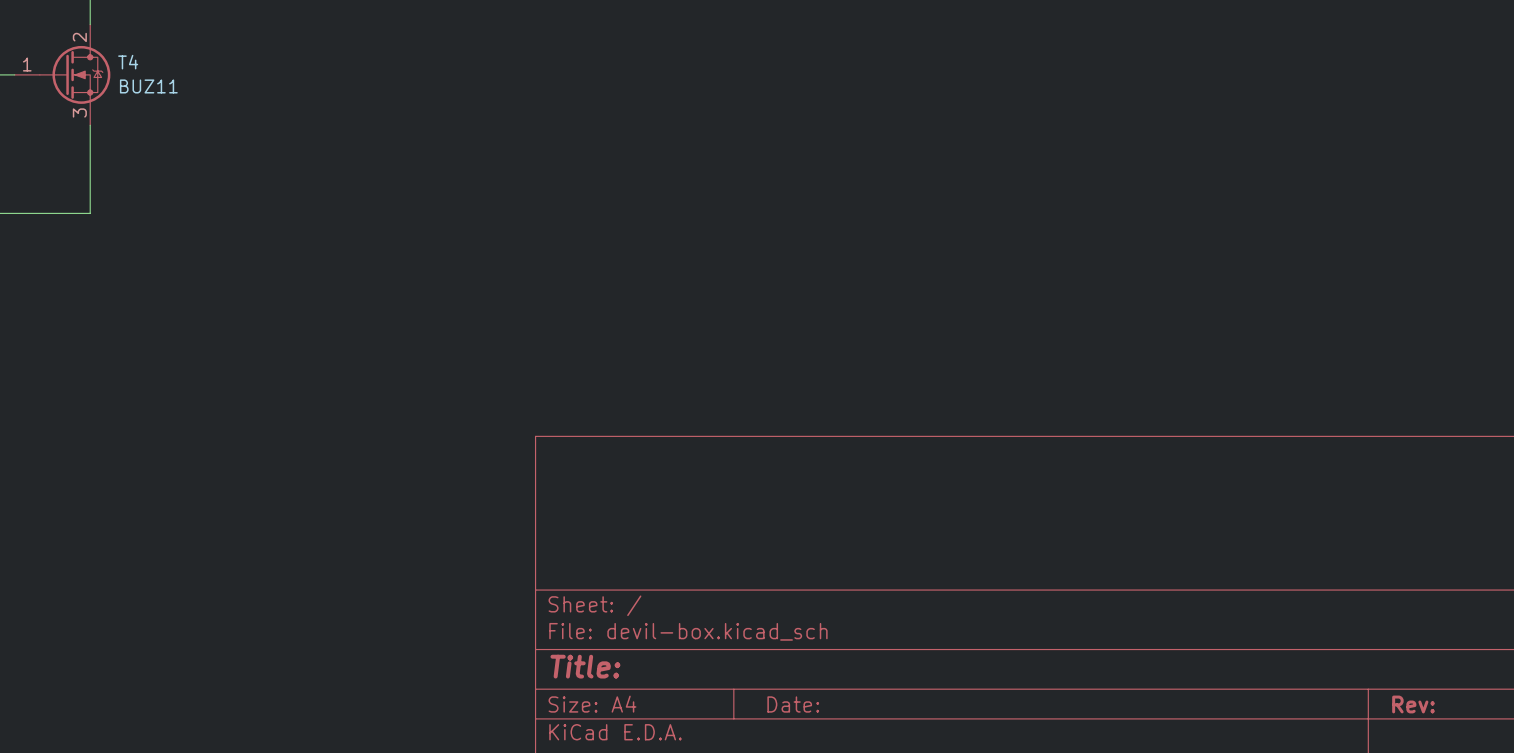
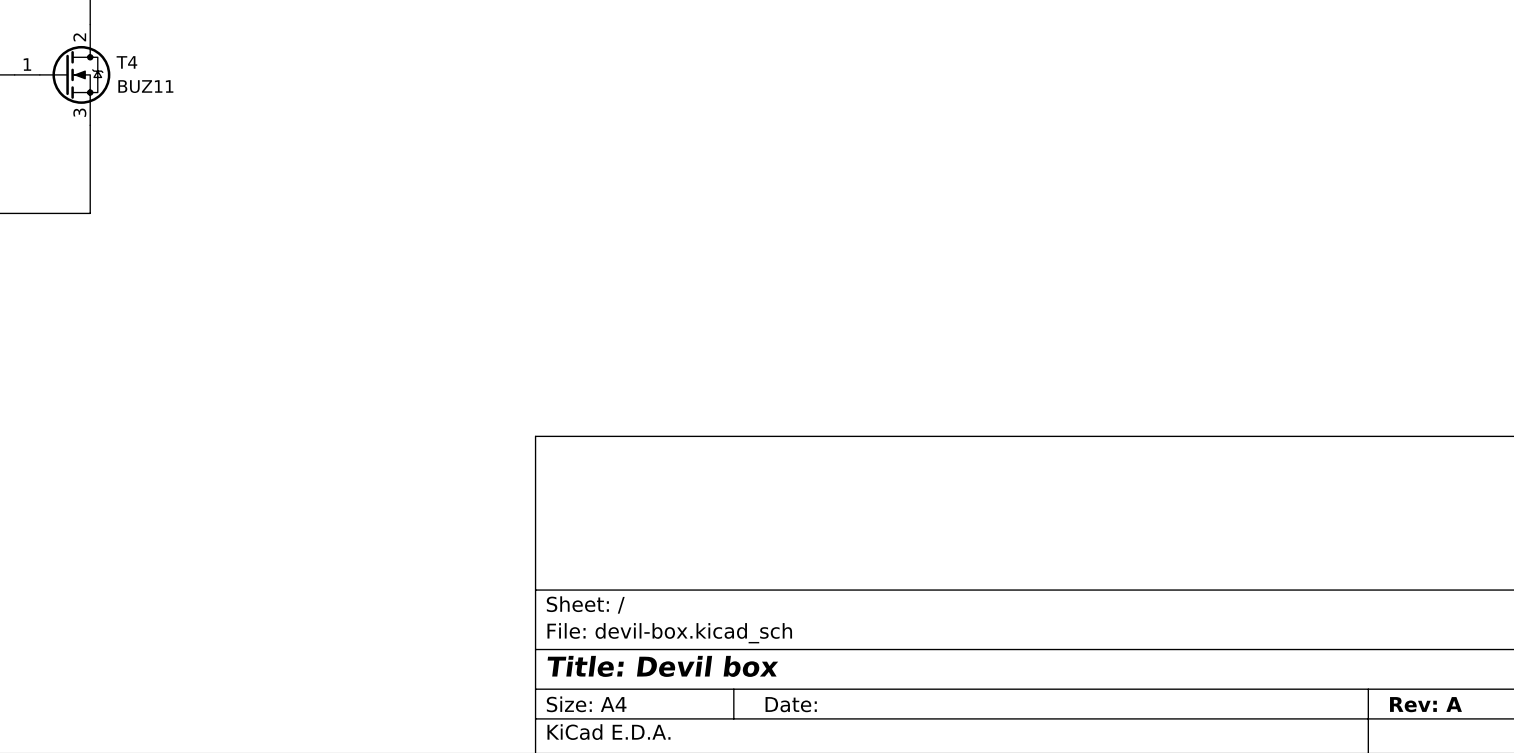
title block: Title: (585, 666) -> Title: Devil box (662, 666)
title block: Rev: (1413, 704) -> Rev: A (1425, 704)

